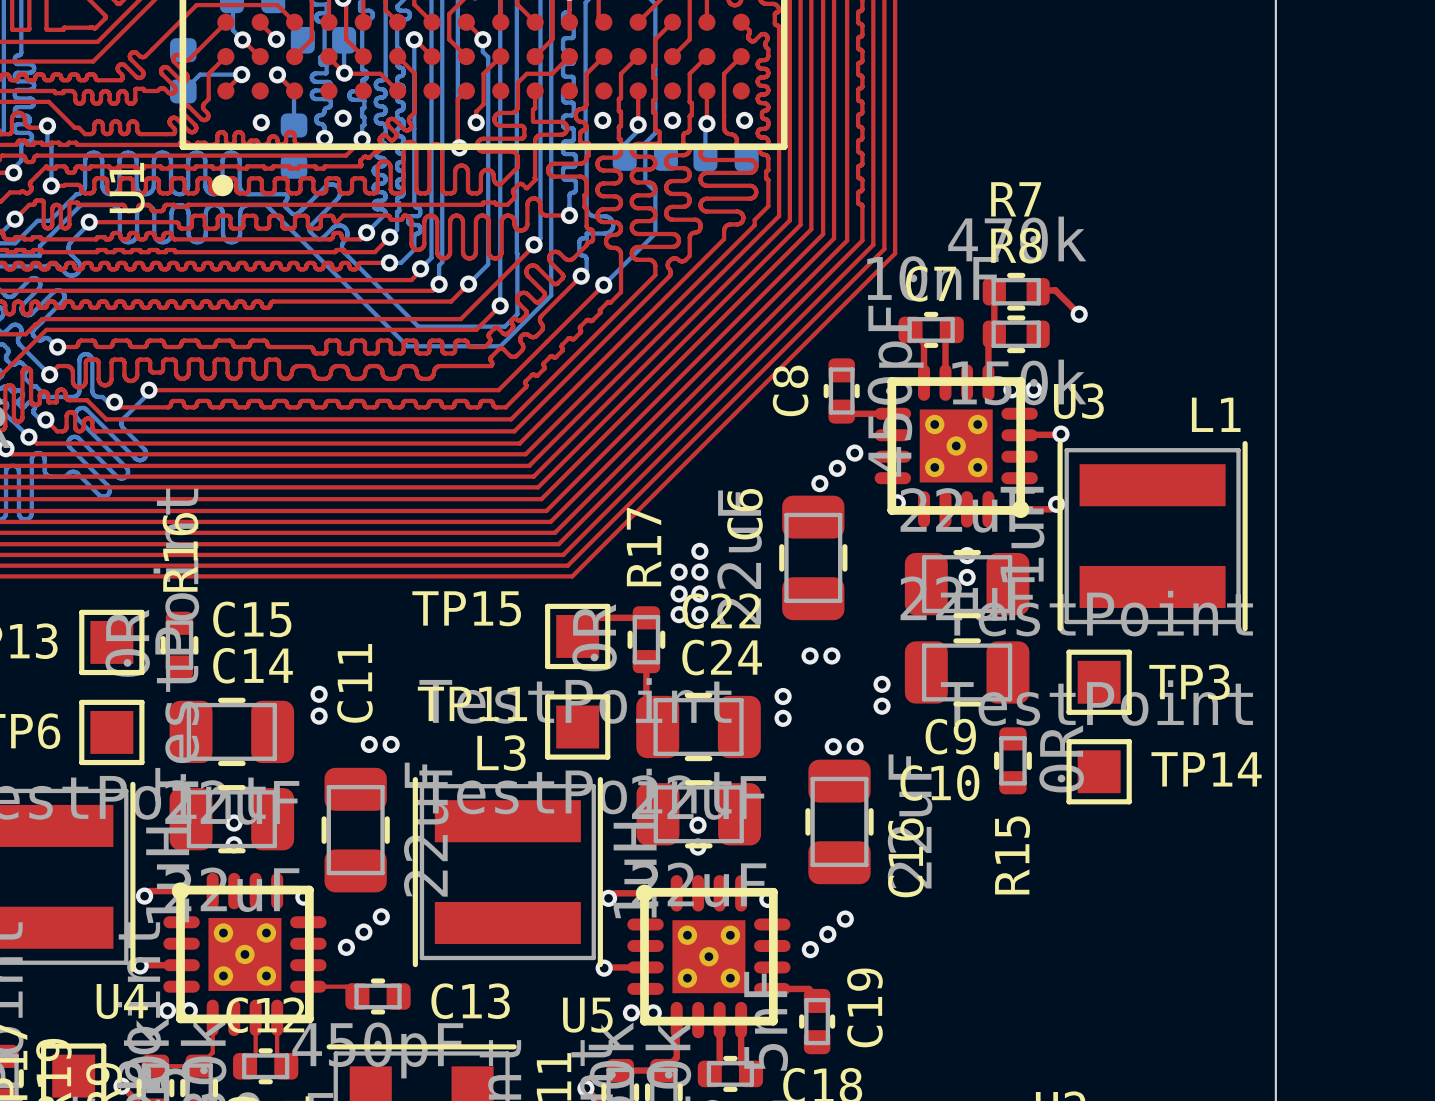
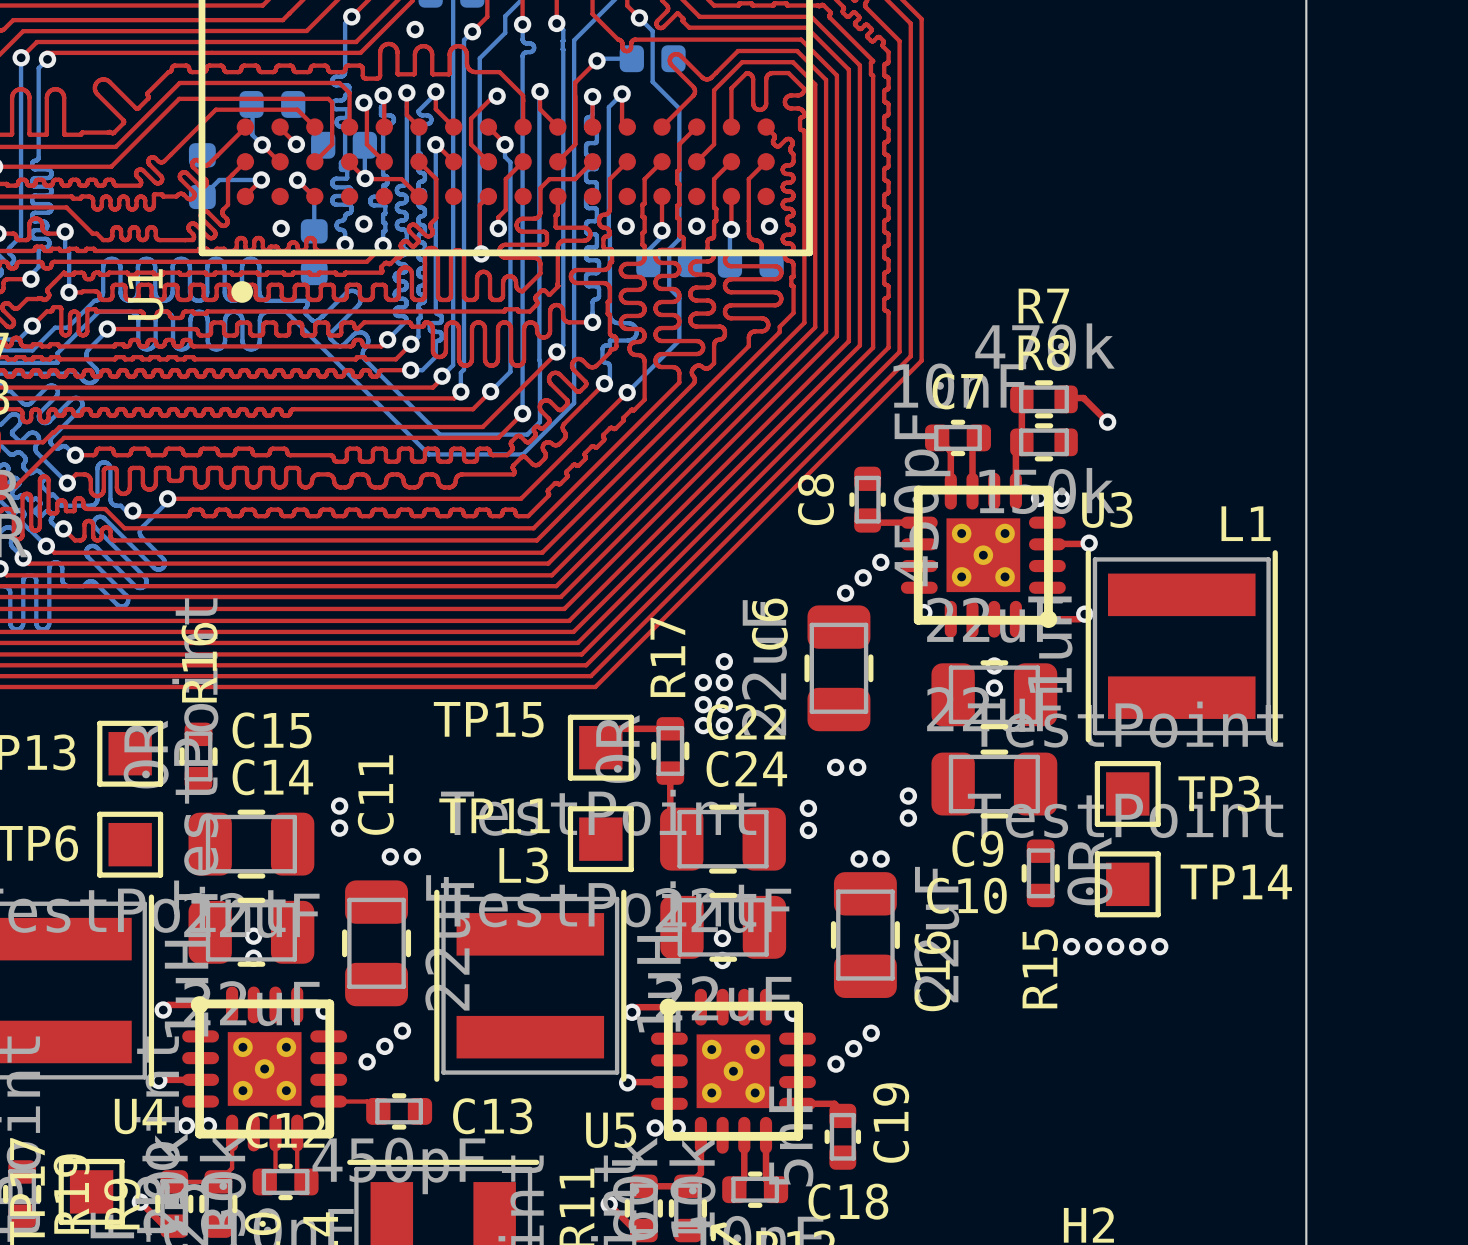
via: none -> (1071, 946)
via: none -> (1093, 946)
via: none -> (1115, 946)
via: none -> (1137, 946)
via: none -> (1159, 946)

